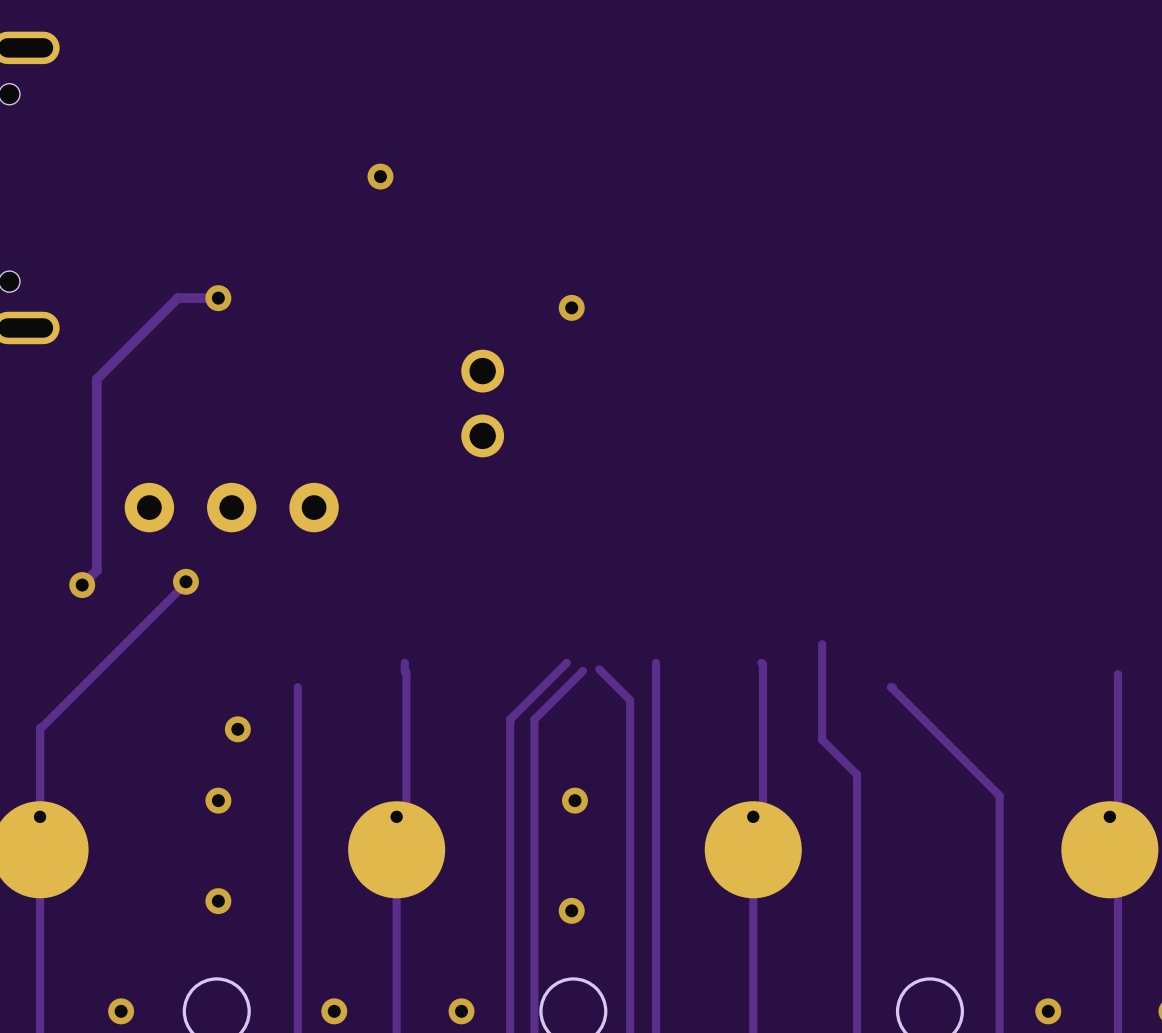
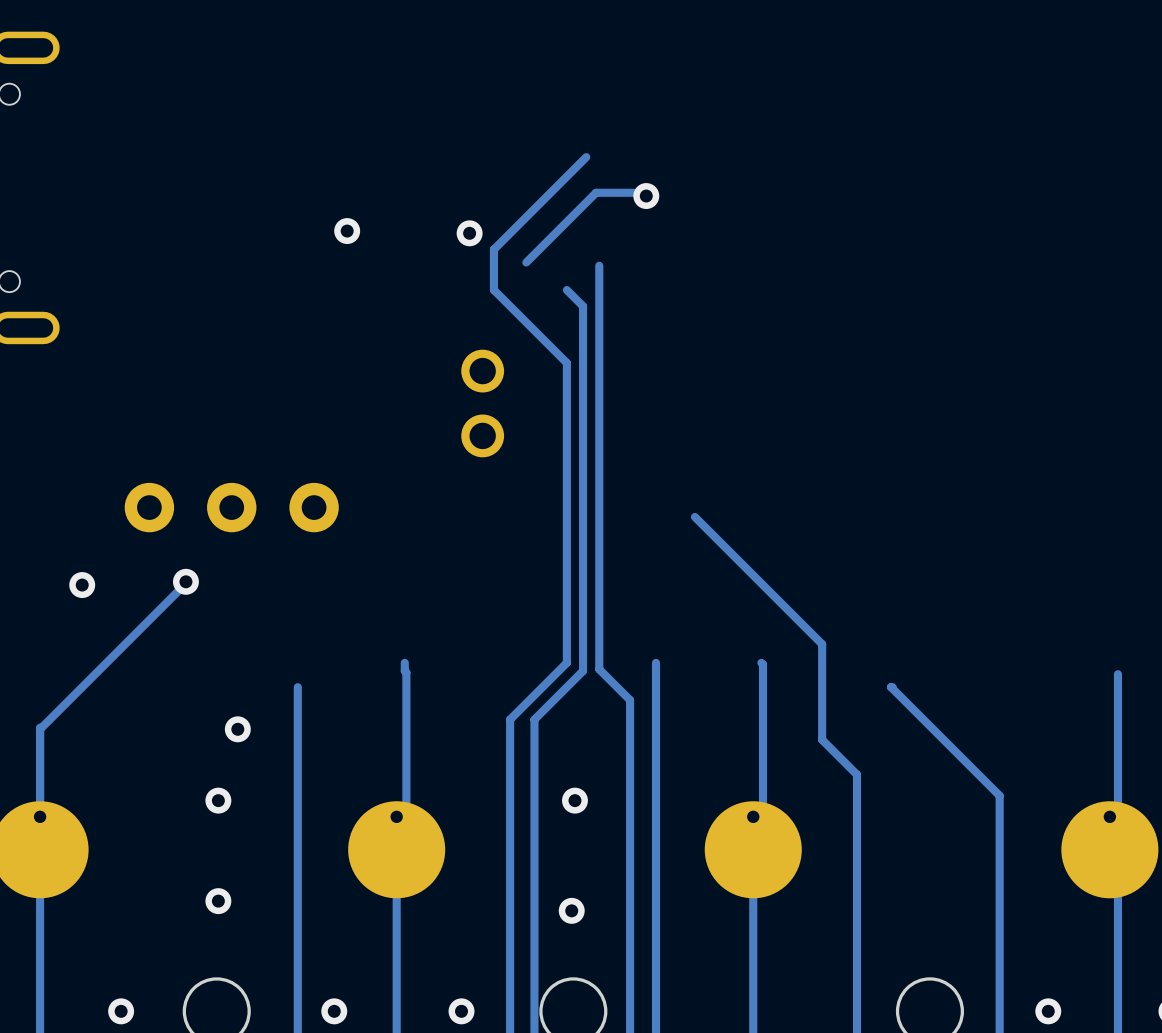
track: none -> (586, 157) (493, 249) (493, 290) (566, 362) (566, 662)
via: (380, 176) -> none
track: none -> (639, 192) (596, 192) (526, 262)
via: none -> (646, 196)
via: none -> (347, 231)
via: none -> (469, 233)
track: none -> (599, 265) (599, 669)
track: none -> (566, 290) (583, 306) (583, 670)
track: (218, 298) (177, 298) (96, 379) (96, 570) (82, 585) -> none
via: (218, 298) -> none
via: (571, 307) -> none
track: none -> (694, 516) (822, 644)

